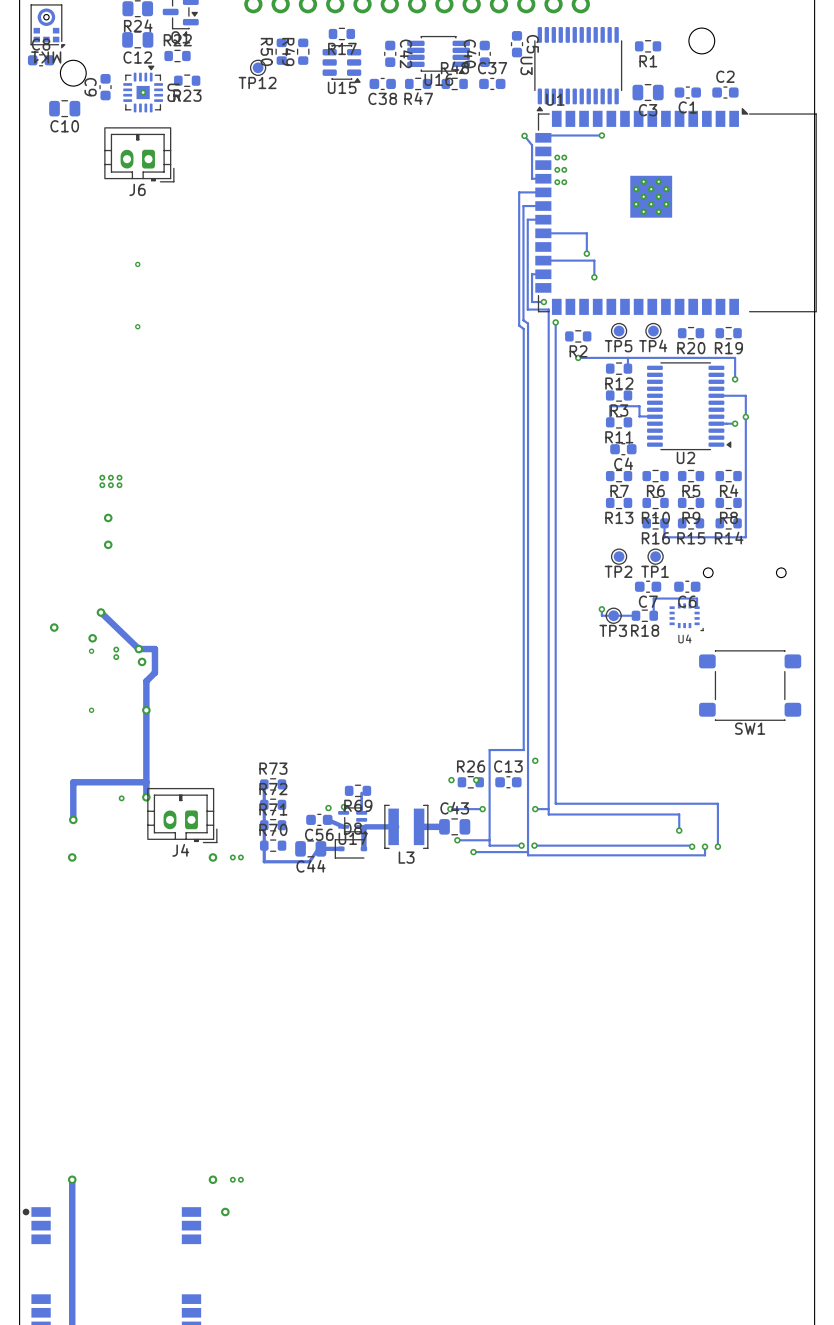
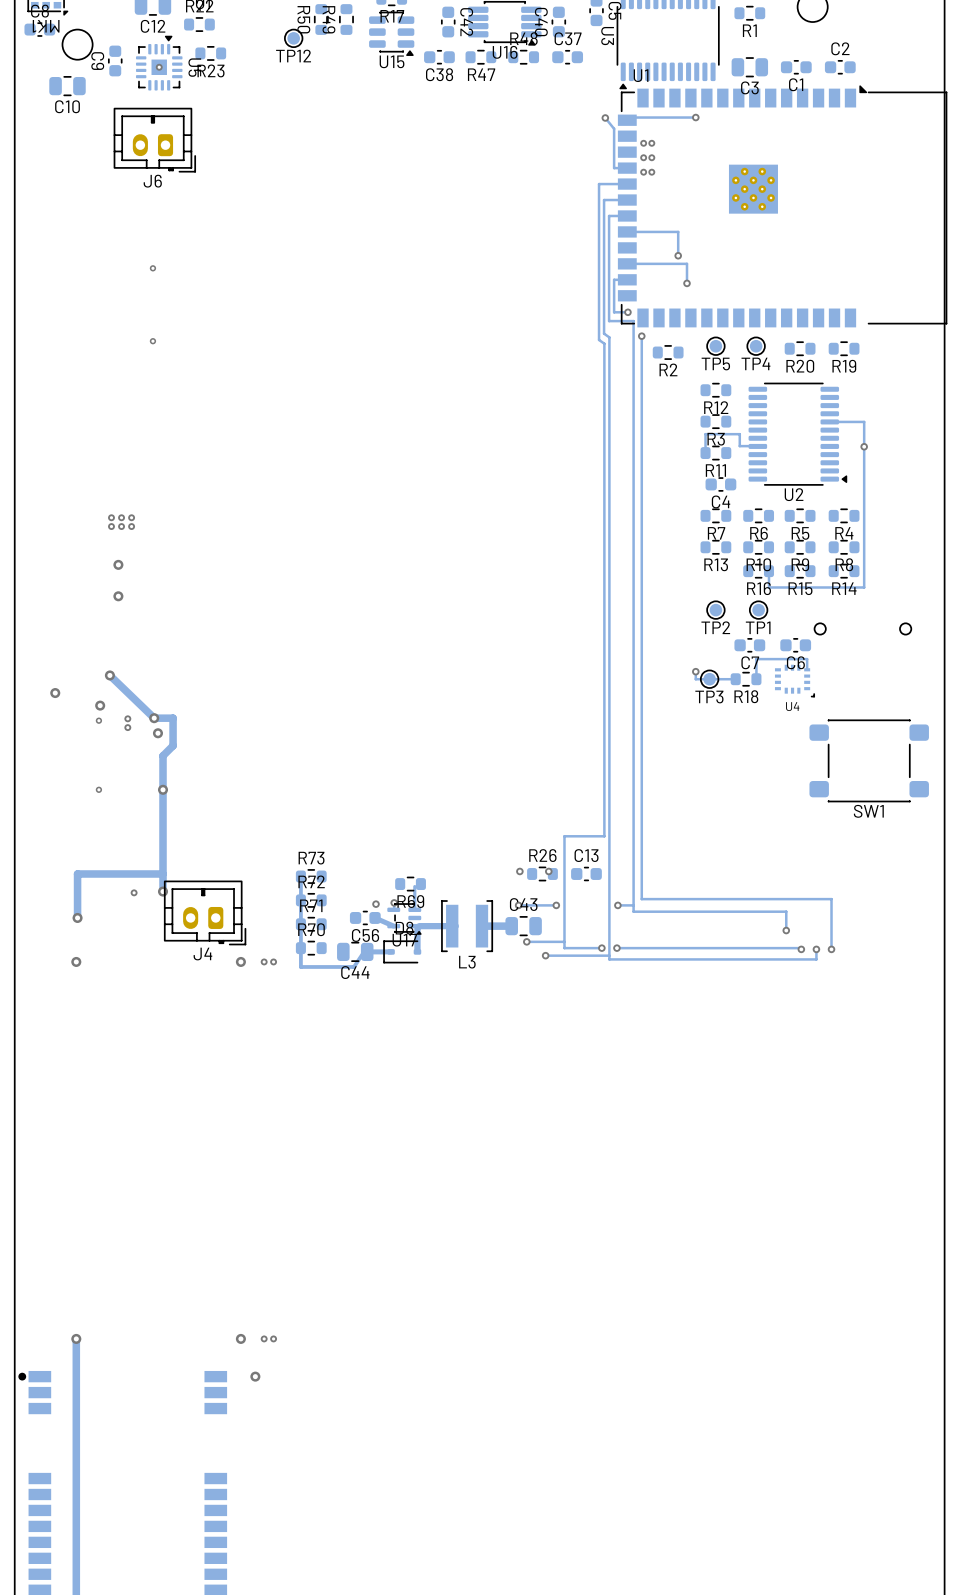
track: (578, 357) (735, 357) (735, 379) -> none
via: (578, 357) -> none
track: (627, 357) (627, 368) -> none
via: (735, 379) -> none
track: (735, 423) (721, 423) -> none
via: (735, 423) -> none
via: (535, 760) -> none

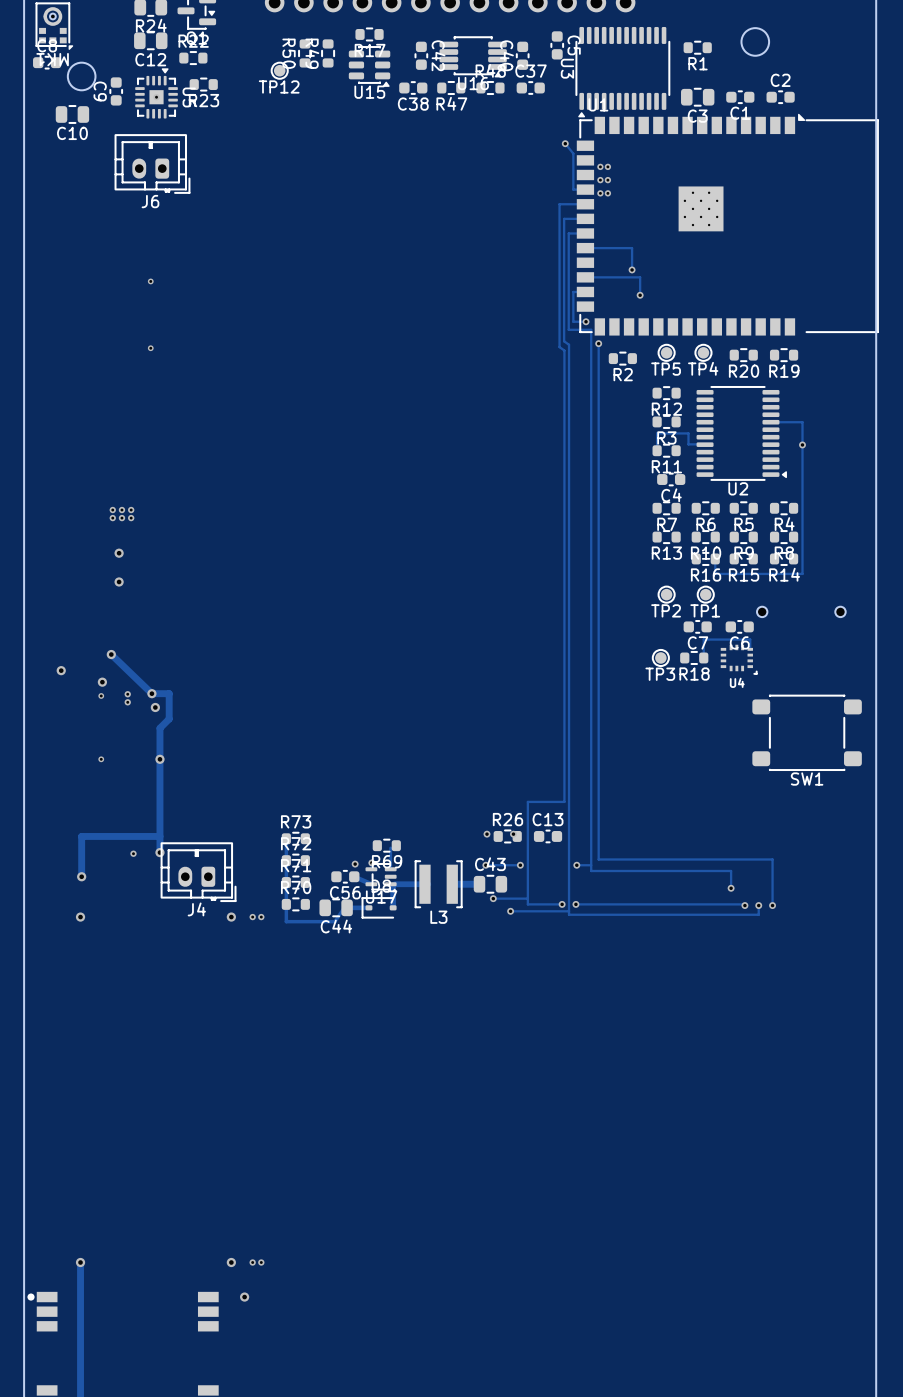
track: (695, 117) (630, 117) -> none
via: (695, 117) -> none
track: (695, 671) (695, 679) (733, 679) -> none
via: (695, 671) -> none

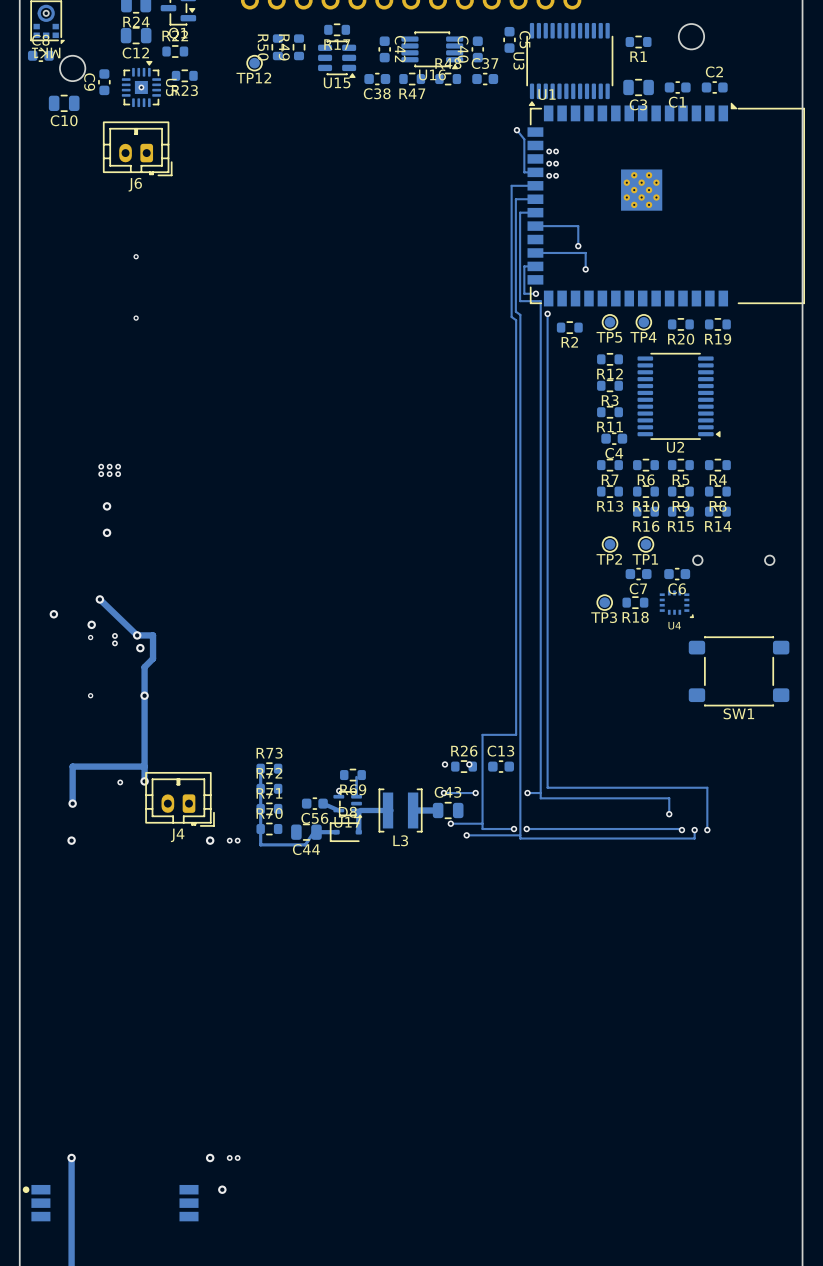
track: (779, 422) (802, 422) (802, 573) (715, 573) (715, 560) -> none
track: (698, 444) (688, 444) (688, 433) (657, 433) (657, 450) -> none
via: (802, 444) -> none
track: (750, 649) (750, 639) (703, 639) (703, 657) -> none
via: (355, 864) -> none

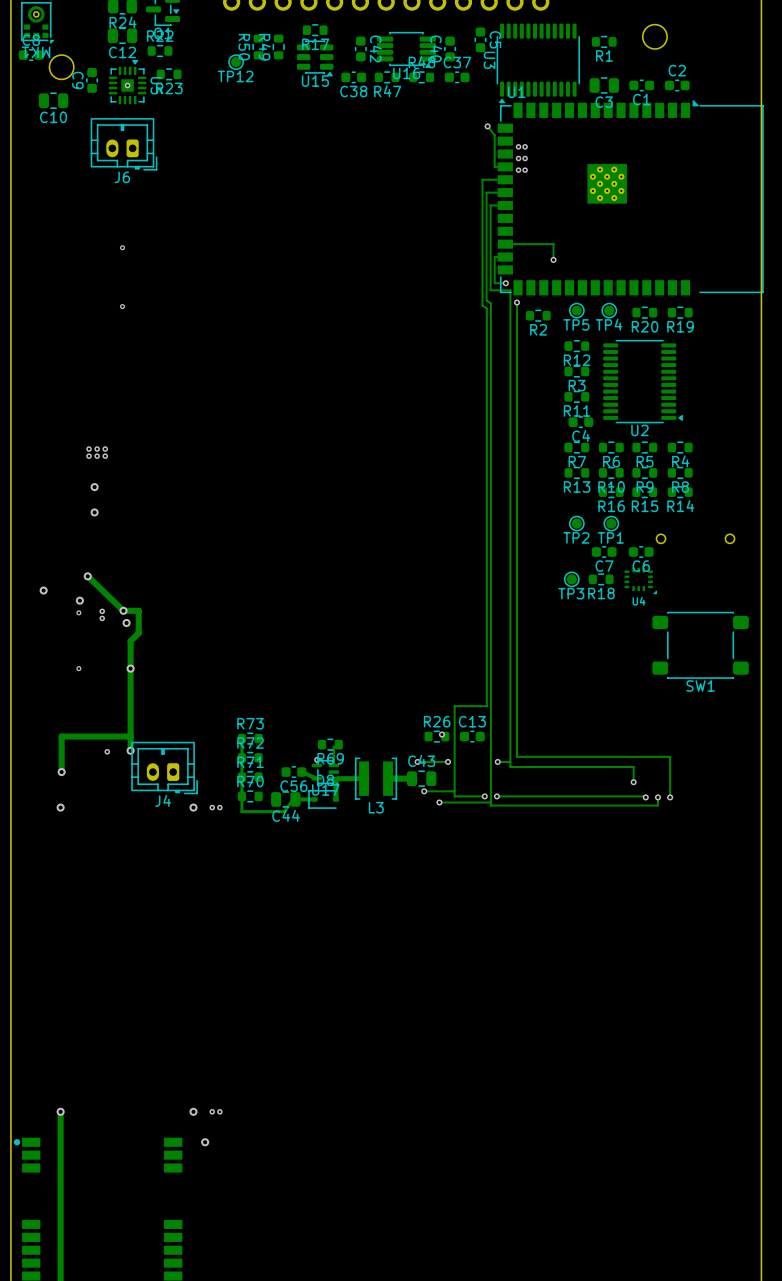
track: (529, 226) (578, 226) (578, 246) -> none
via: (578, 246) -> none
via: (444, 764) -> none

